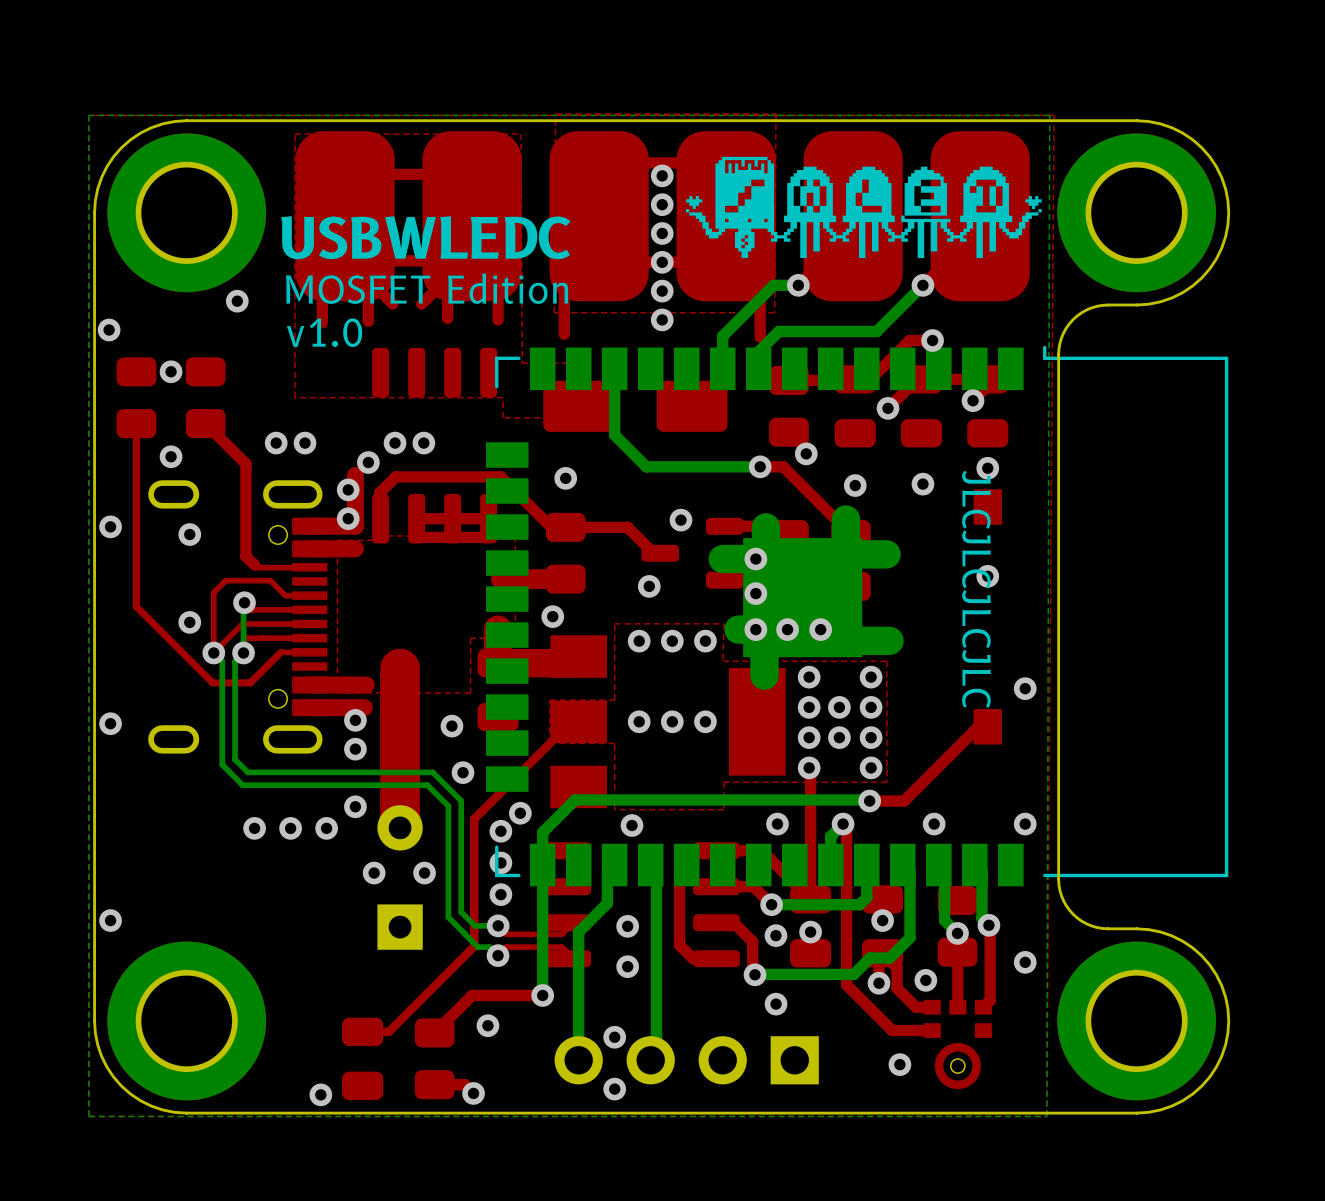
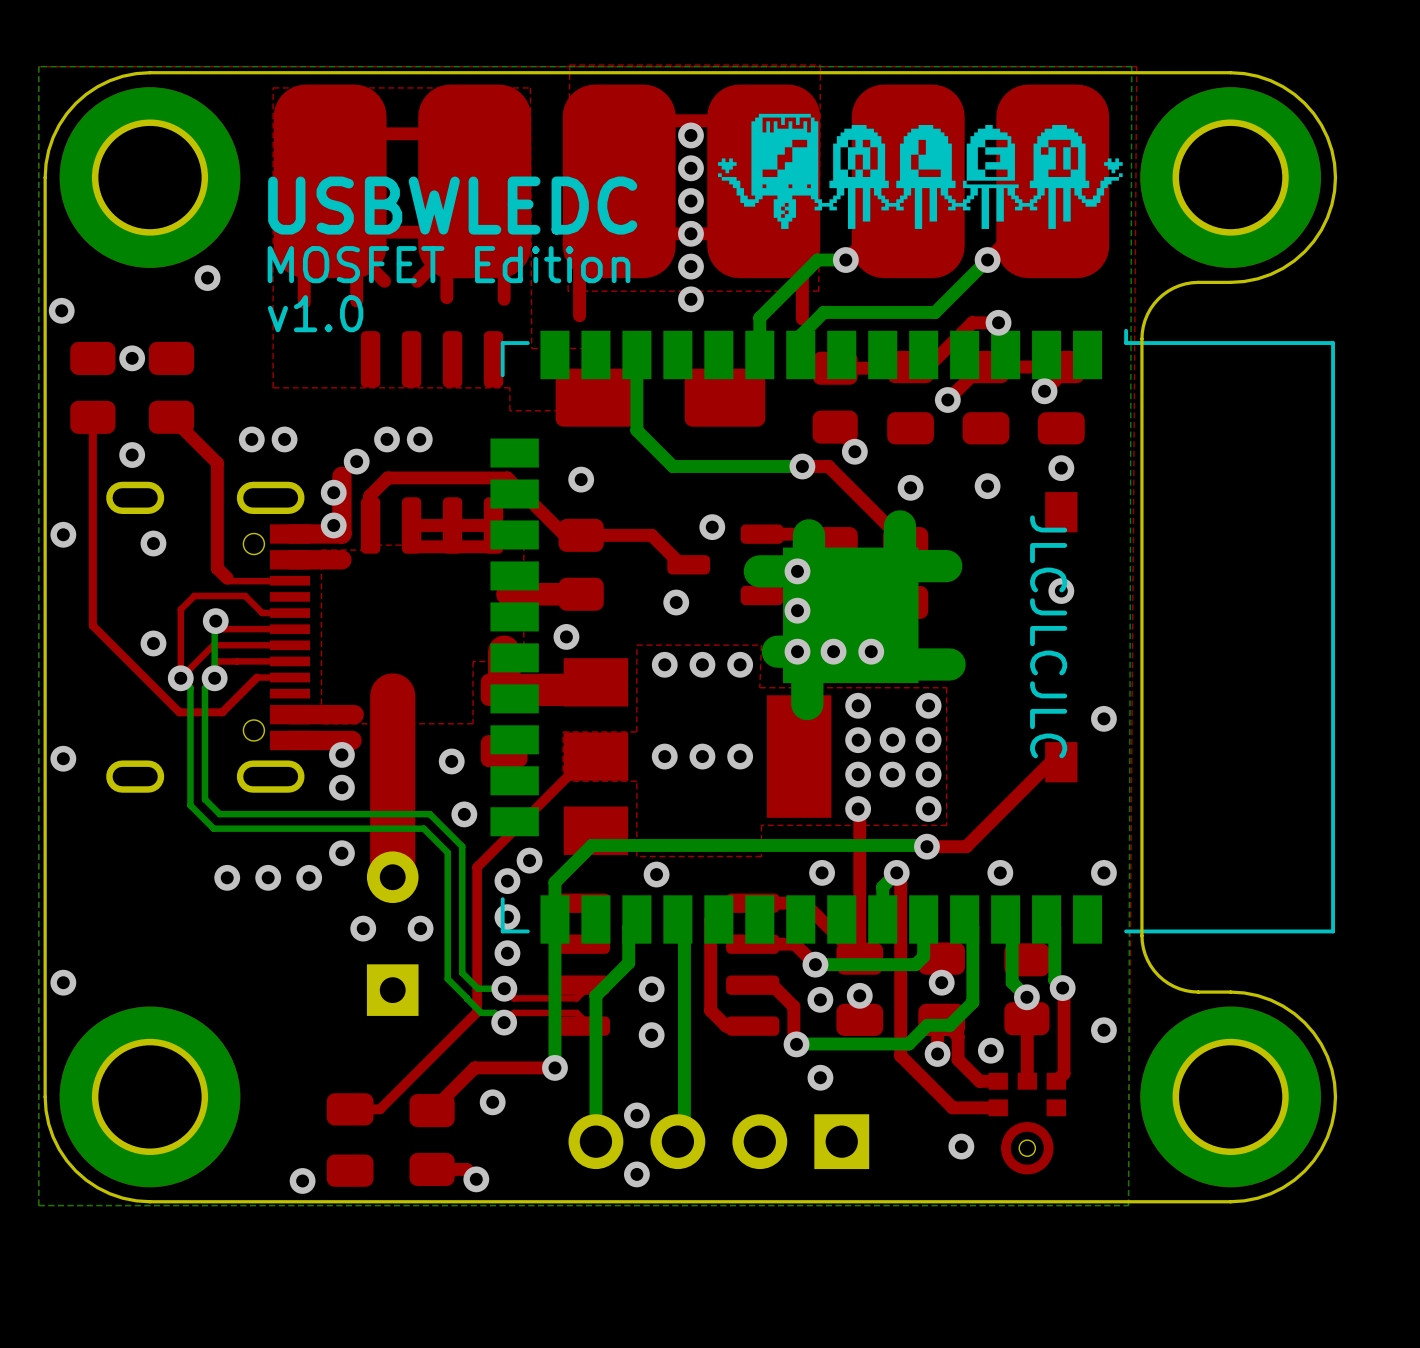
text: JLCJLCJLCJLC (976, 589) -> JLCJLCJLC (1048, 636)

